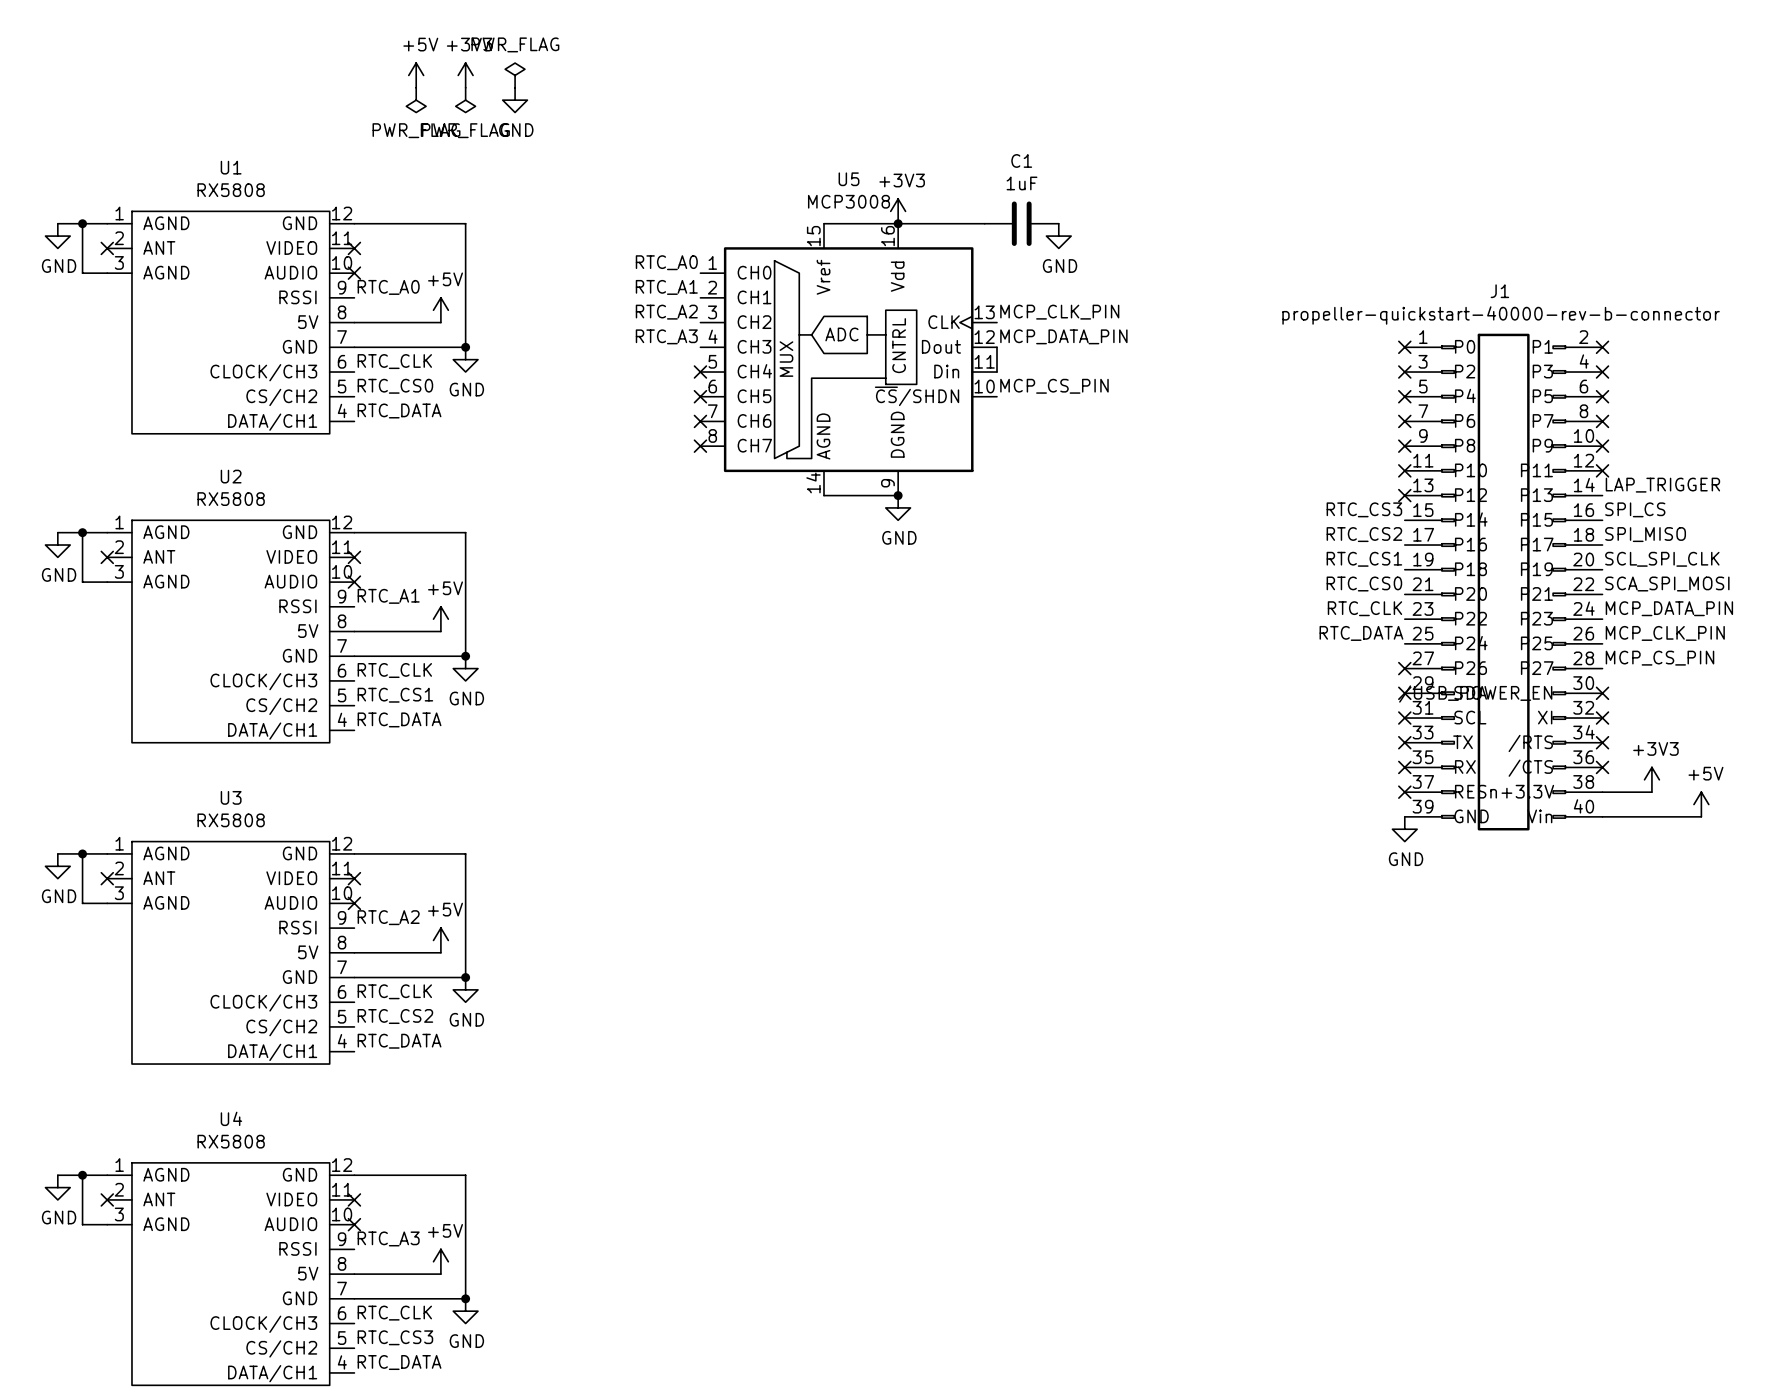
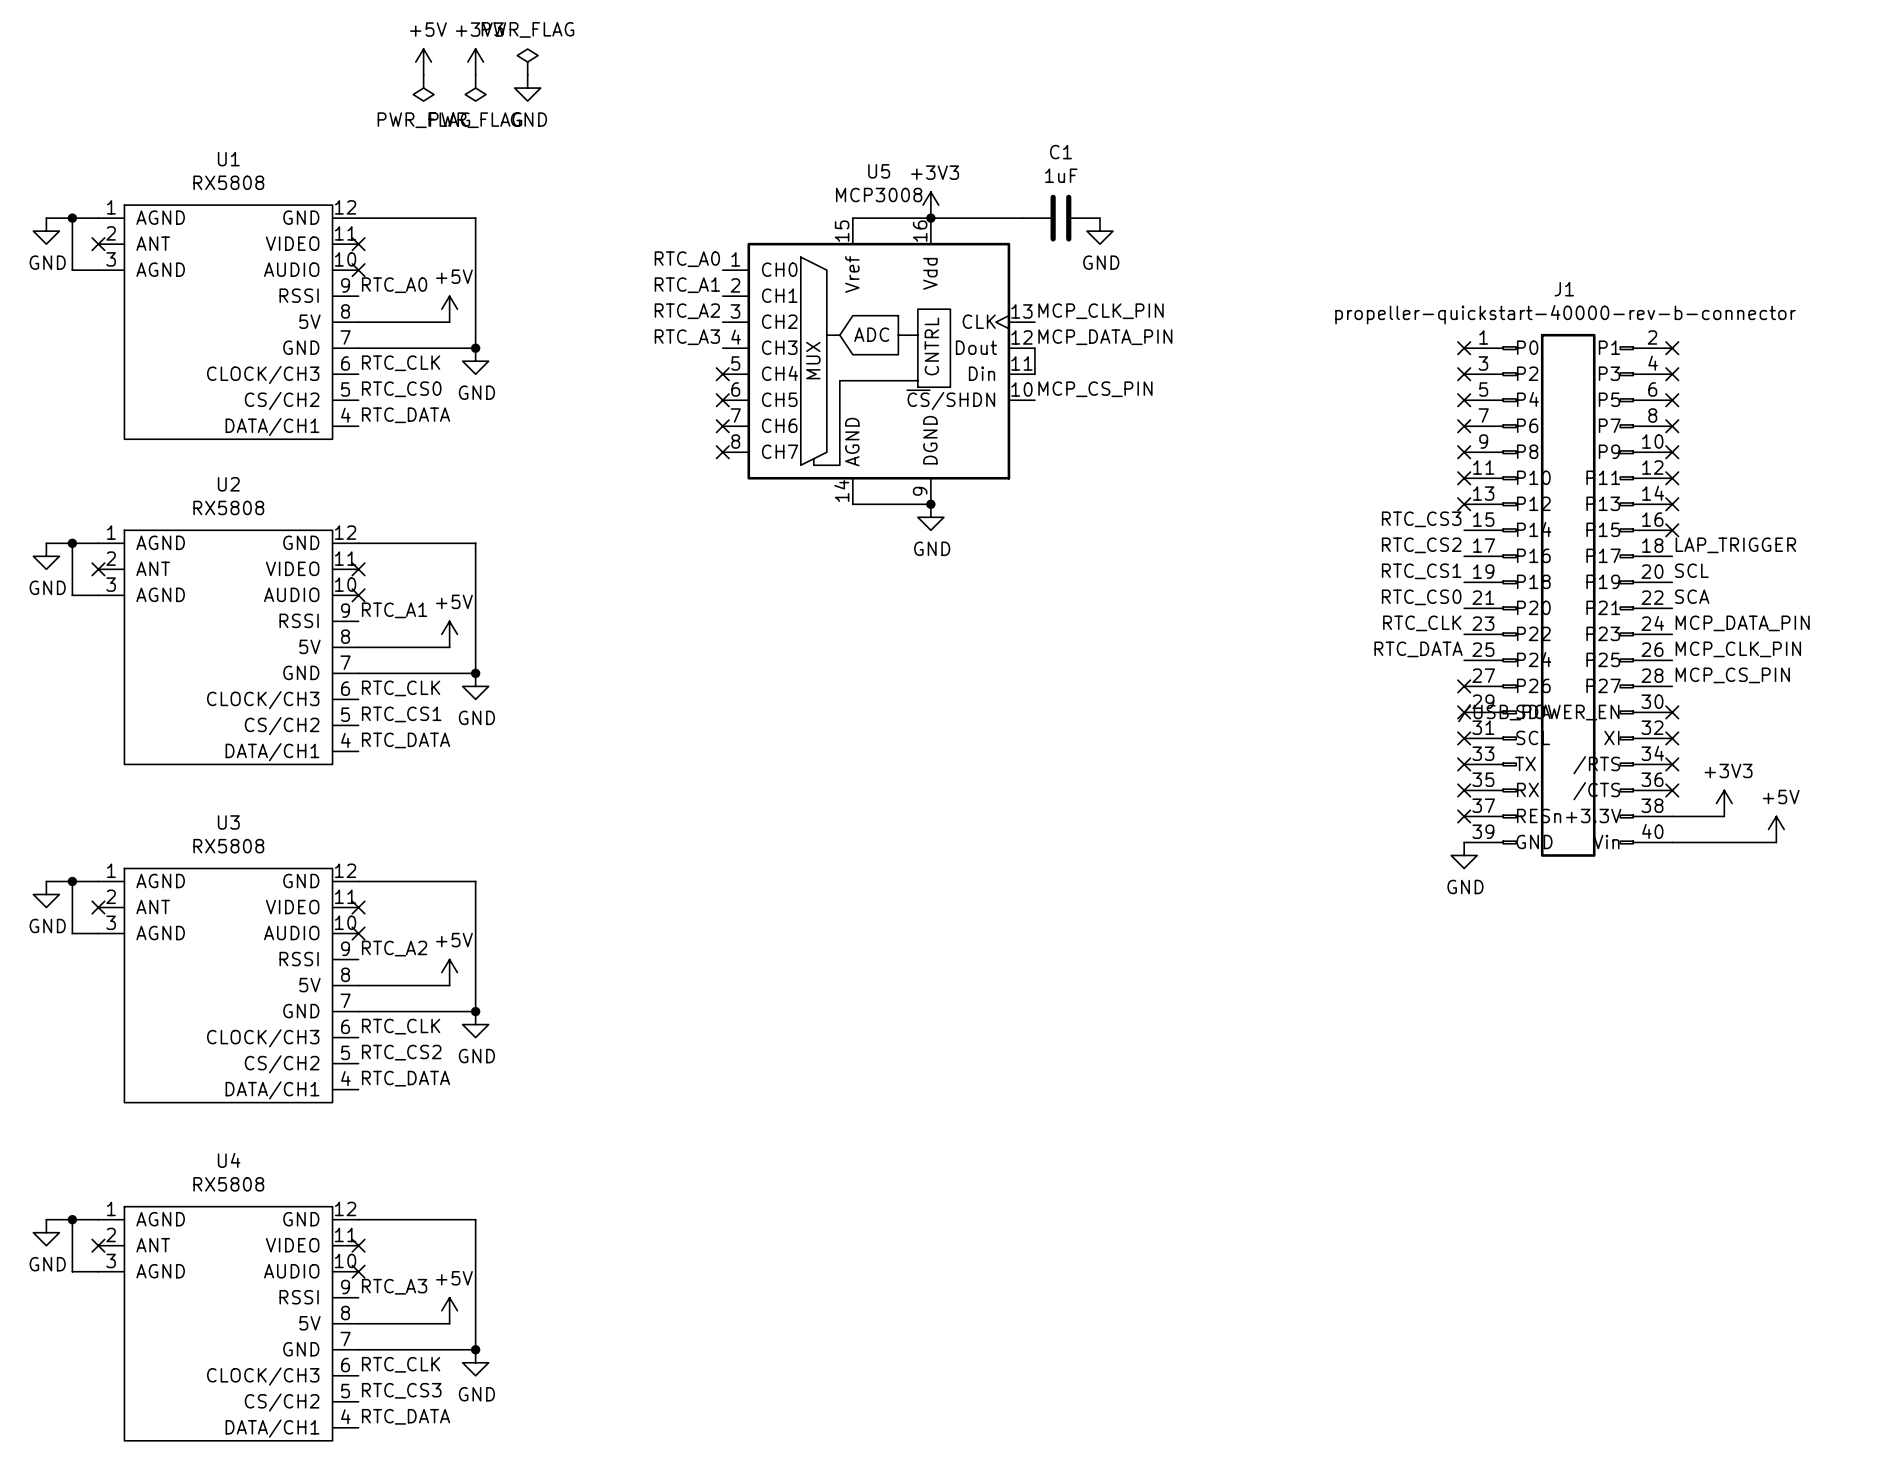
label: LAP_TRIGGER (1662, 485) -> none
no-connect mark: none -> (1672, 504)
label: SPI_CS (1635, 509) -> none
no-connect mark: none -> (1672, 530)
label: SPI_MISO (1645, 534) -> LAP_TRIGGER (1735, 545)
label: SCL_SPI_CLK (1662, 559) -> SCL (1691, 570)
label: SCA_SPI_MOSI (1667, 584) -> SCA (1692, 596)

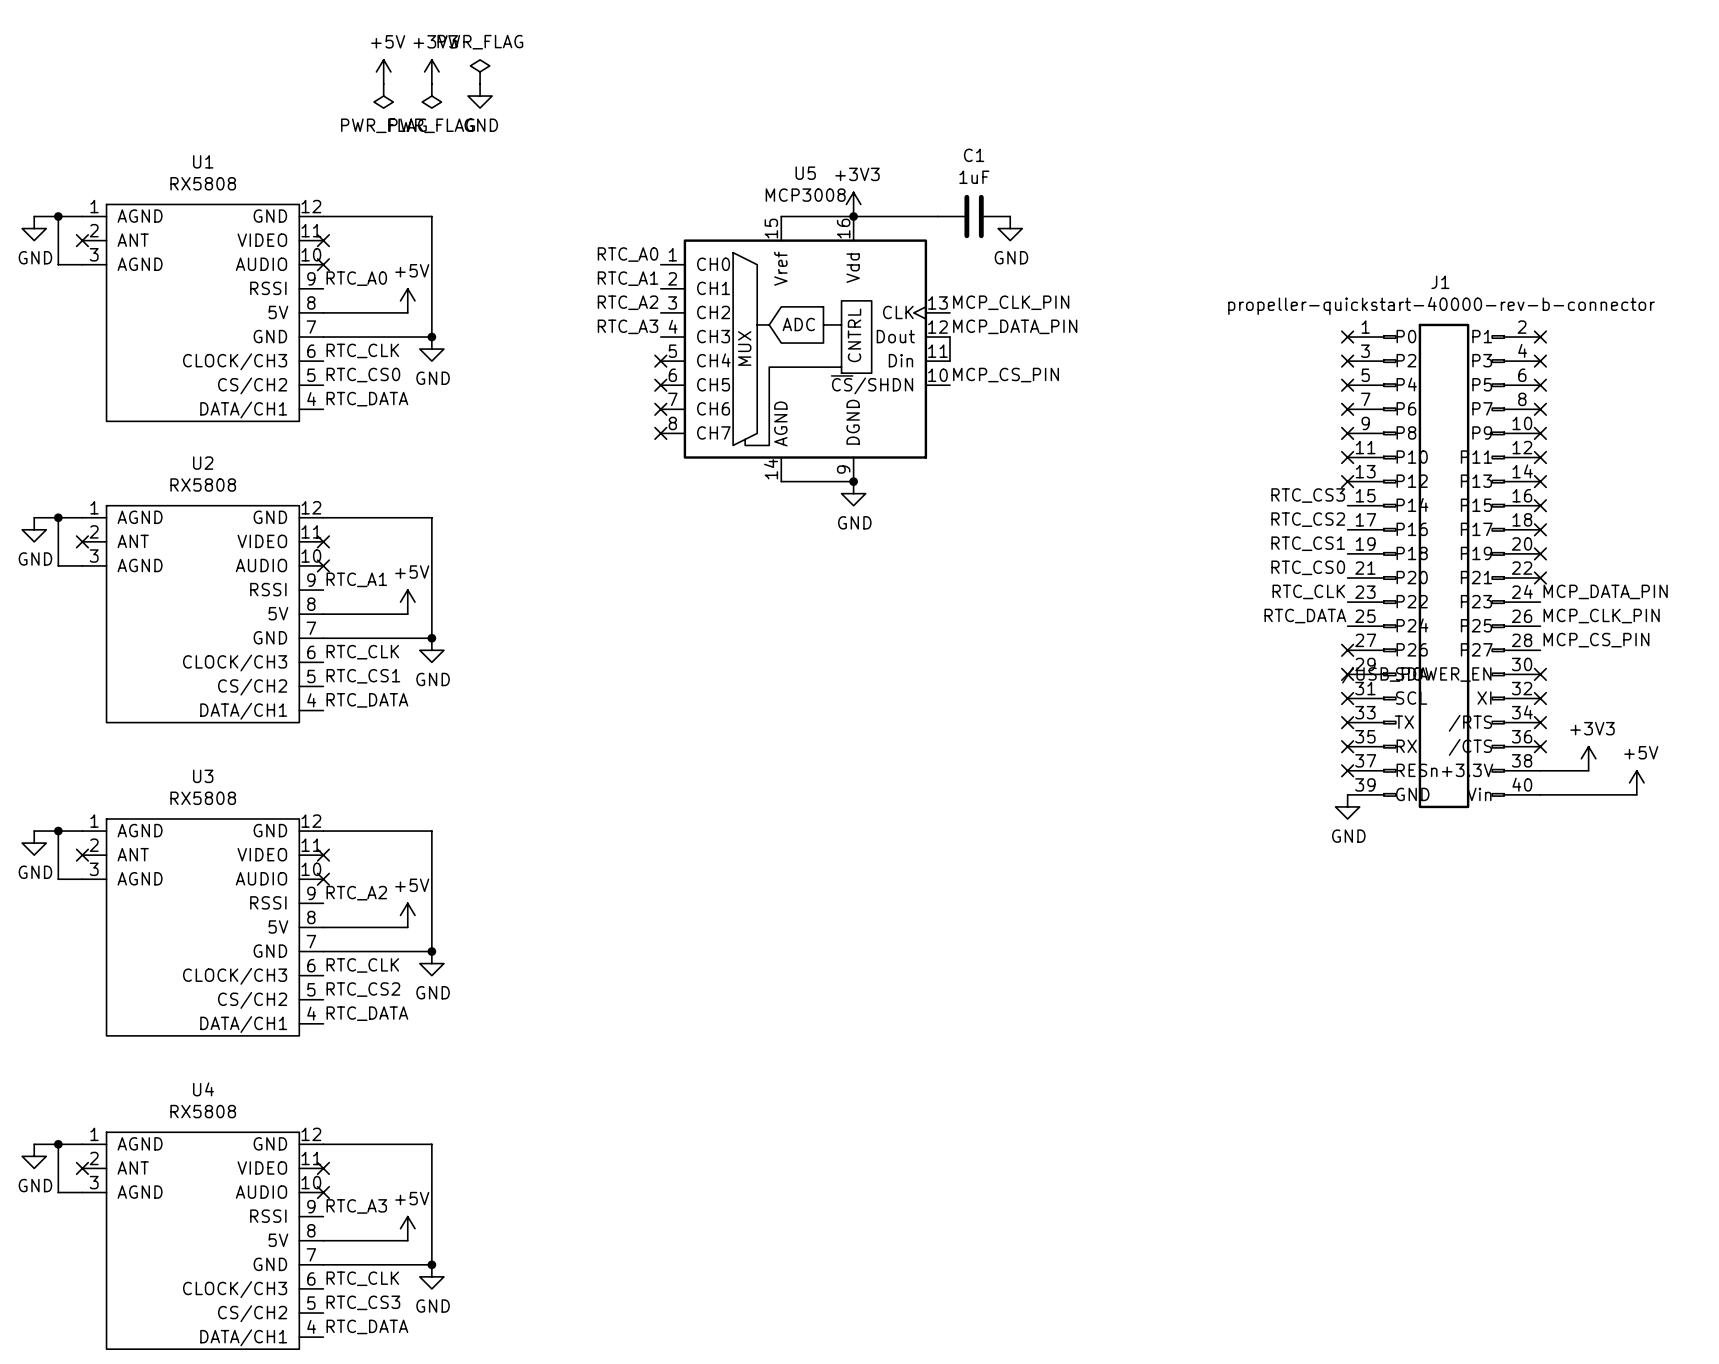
label: LAP_TRIGGER (1735, 545) -> none
no-connect mark: none -> (1540, 529)
label: SCL (1691, 570) -> none
no-connect mark: none -> (1540, 553)
label: SCA (1692, 596) -> none
no-connect mark: none -> (1540, 578)

